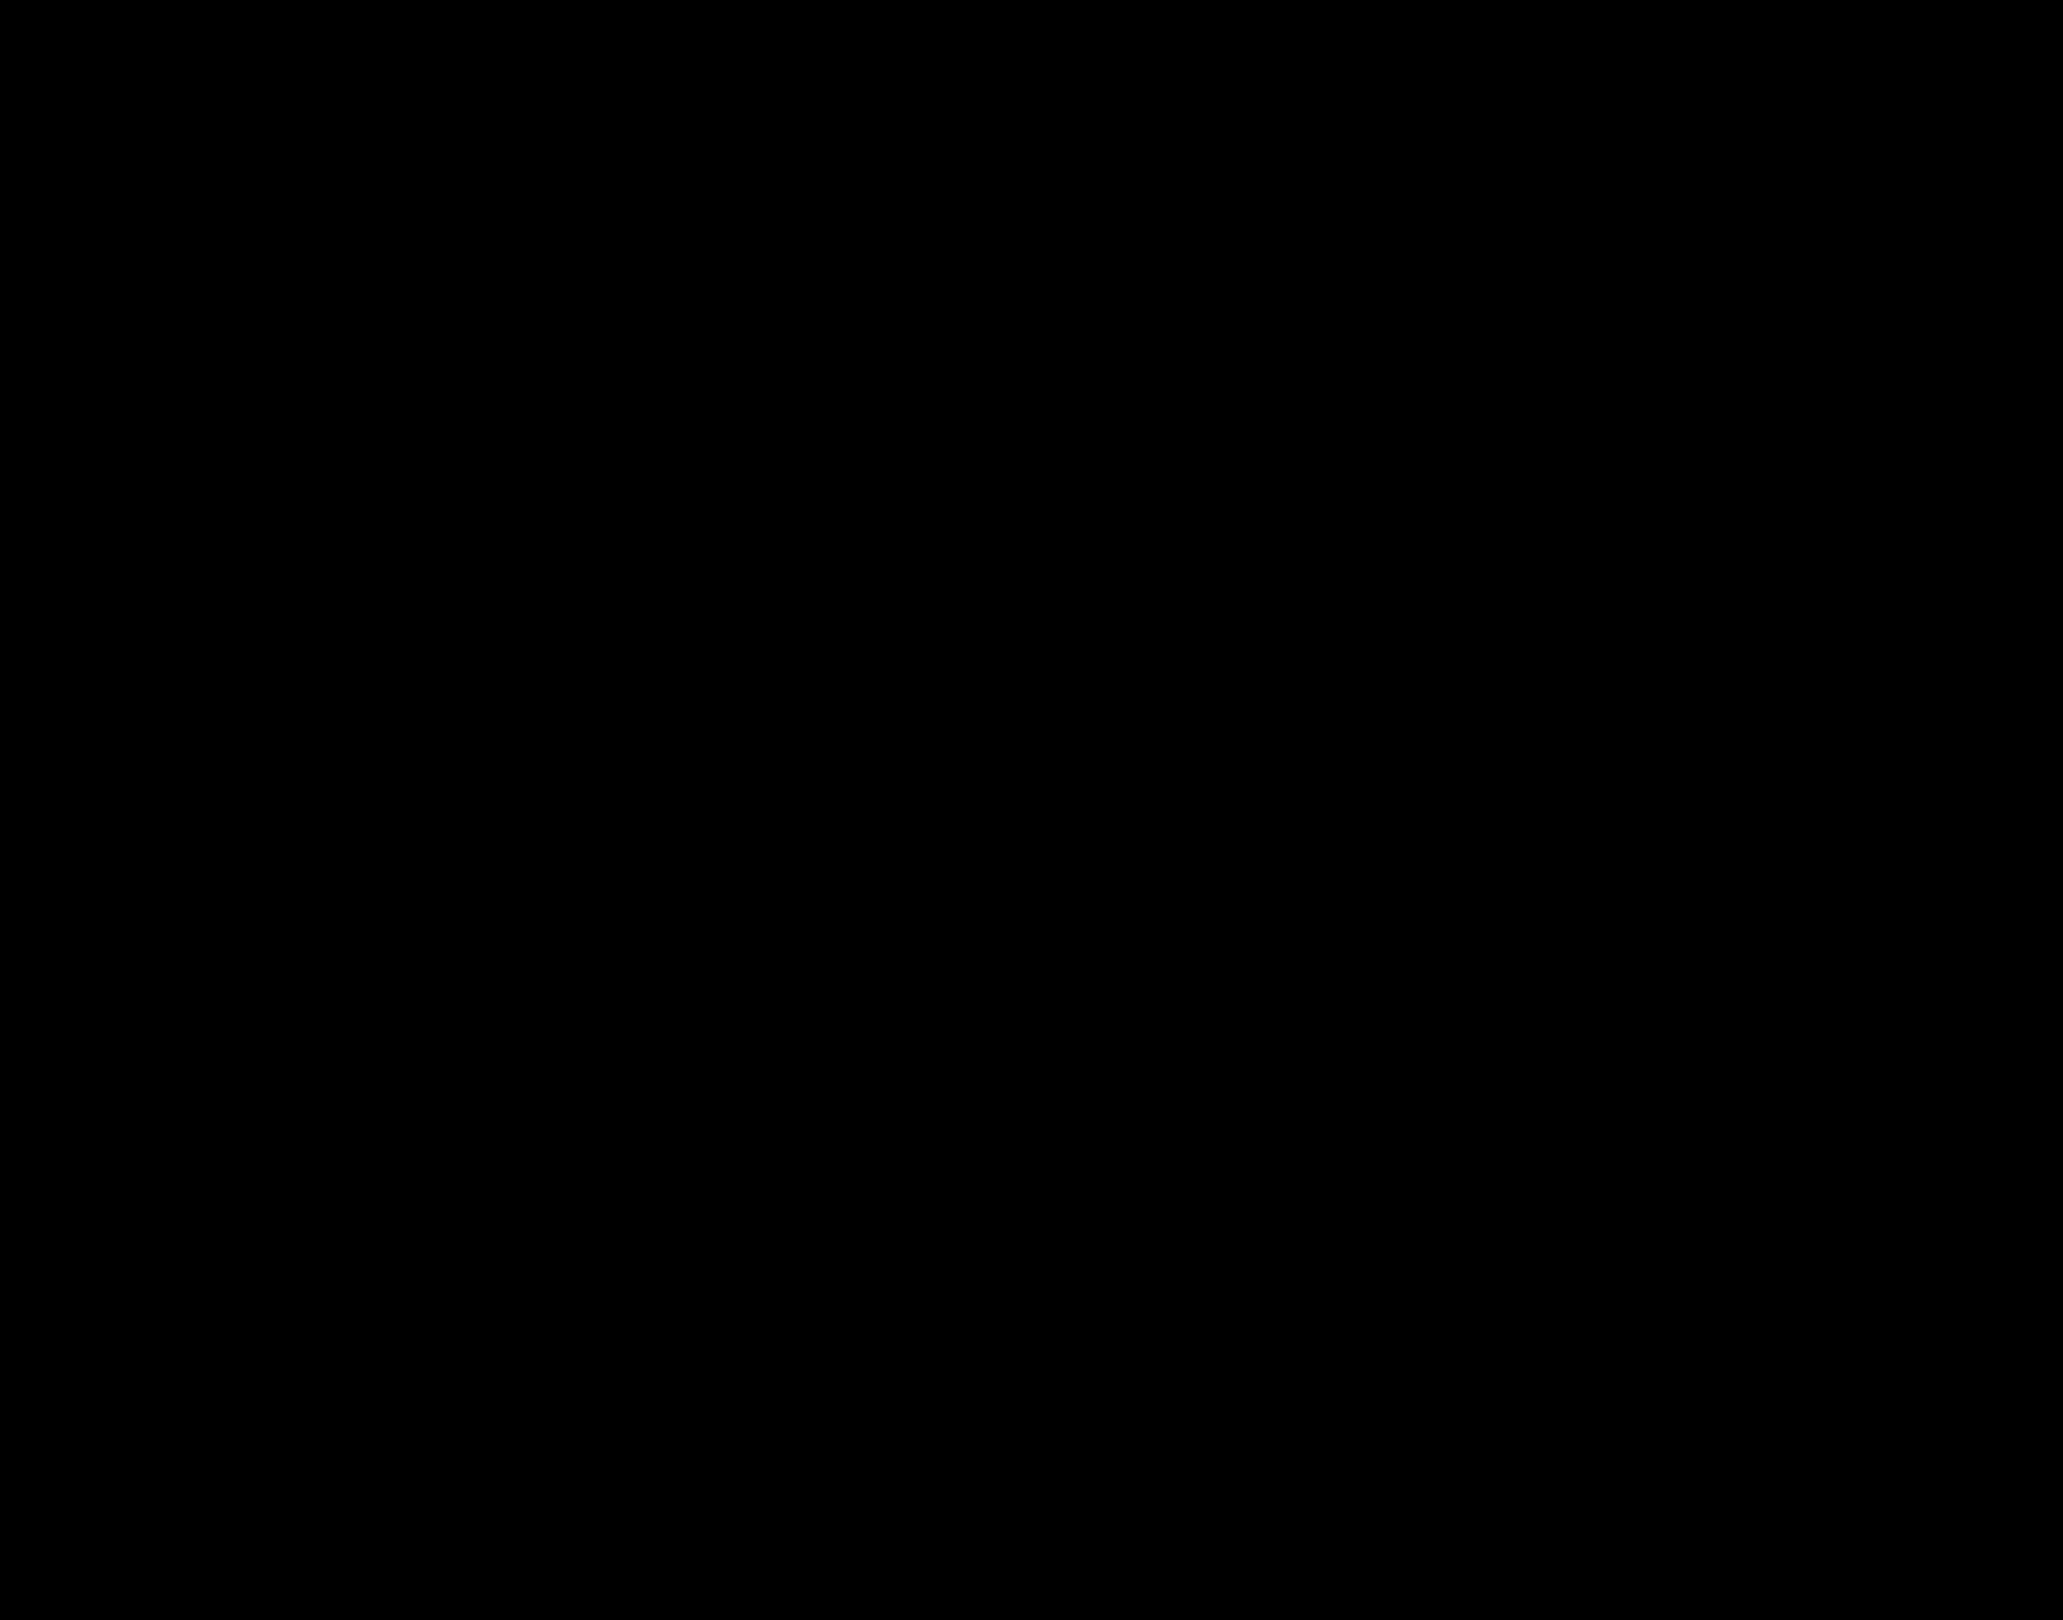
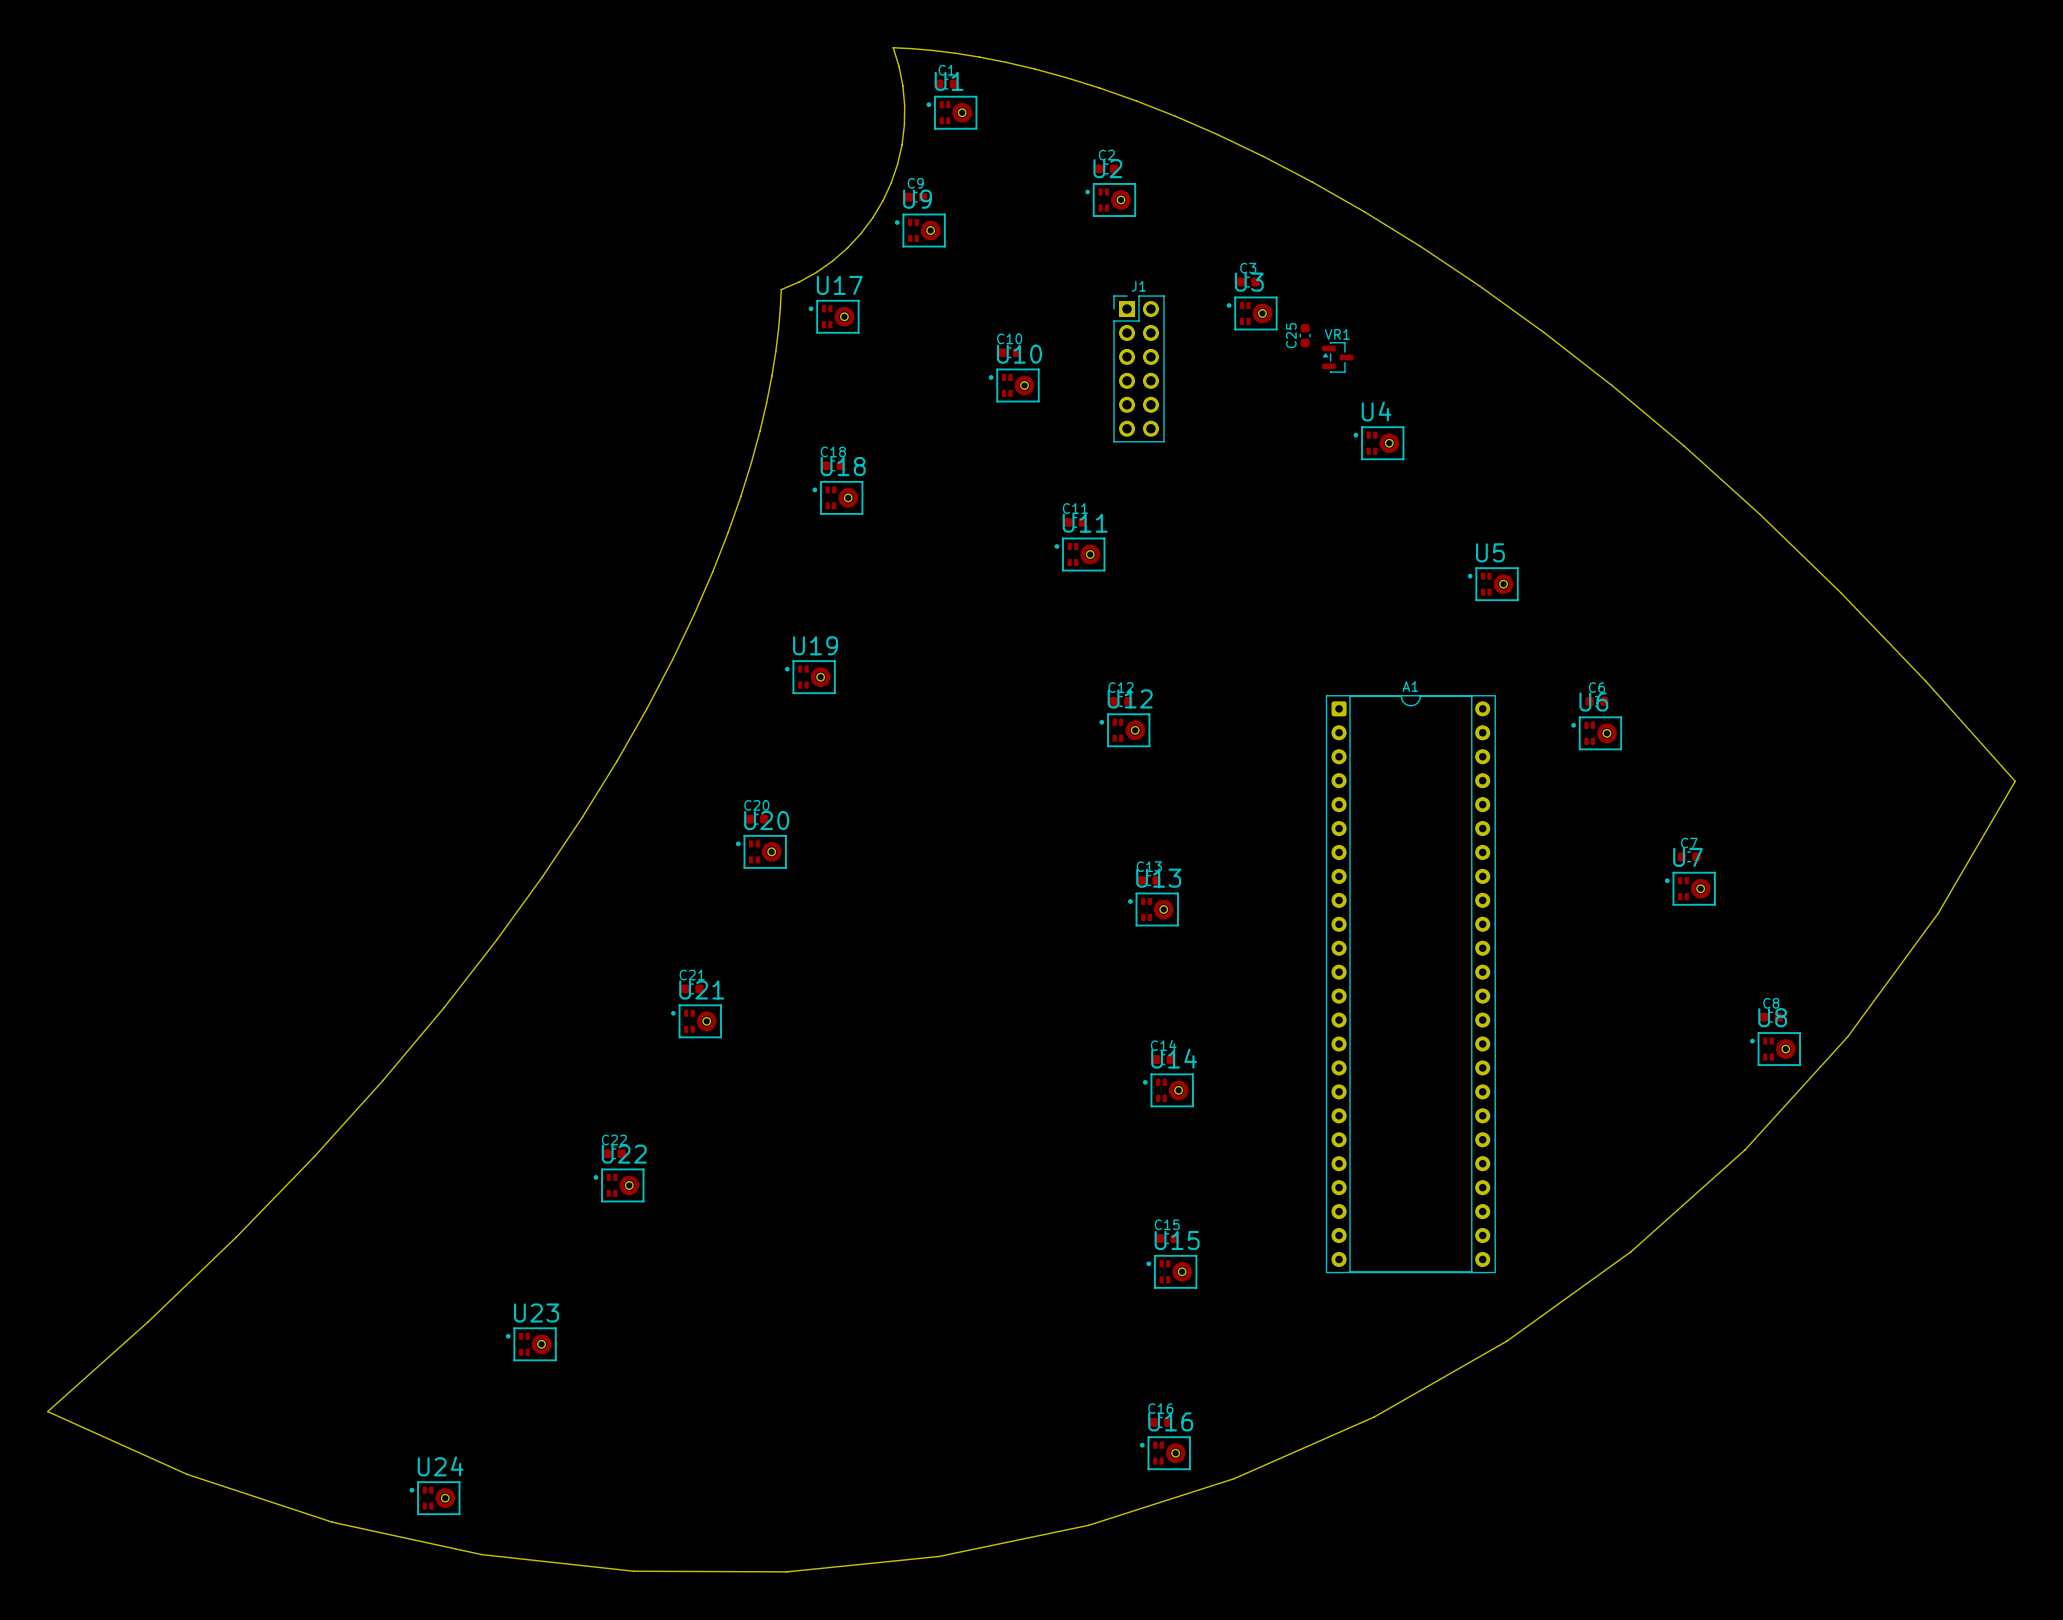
board edge: none -> (893, 47) (902, 85) (904, 105) (902, 144) (891, 182) (872, 217) (847, 247) (816, 272) (781, 289) (775, 351) (766, 402) (751, 462) (728, 532) (694, 614) (672, 659) (617, 760) (582, 816) (496, 940) (443, 1008) (383, 1080) (314, 1156) (236, 1237) (147, 1322) (47, 1411) (187, 1474) (332, 1522) (481, 1554) (633, 1571) (786, 1571) (938, 1556) (1088, 1525) (1234, 1478) (1374, 1417) (1506, 1341) (1630, 1251) (1745, 1149) (1847, 1036) (1938, 913) (2015, 781) (1925, 681) (1840, 592) (1760, 514) (1683, 445) (1611, 385) (1543, 332) (1420, 246) (1312, 181) (1217, 134) (1136, 100) (1034, 69) (955, 53) (893, 47)
C1: none -> (946, 84)
U1: none -> (951, 112)
C2: none -> (1106, 168)
C9: none -> (915, 197)
U2: none -> (1110, 199)
U9: none -> (920, 230)
C3: none -> (1248, 282)
U3: none -> (1252, 313)
U17: none -> (834, 316)
C25: none -> (1305, 335)
C10: none -> (1009, 352)
VR1: none -> (1337, 357)
J1: none -> (1138, 368)
U10: none -> (1014, 385)
U4: none -> (1378, 443)
C18: none -> (833, 465)
U18: none -> (837, 497)
C11: none -> (1075, 522)
U11: none -> (1079, 554)
U5: none -> (1493, 584)
U19: none -> (810, 677)
C12: none -> (1120, 701)
C6: none -> (1596, 701)
U12: none -> (1124, 730)
U6: none -> (1596, 733)
C20: none -> (756, 819)
U20: none -> (761, 851)
C7: none -> (1689, 856)
C13: none -> (1149, 880)
U7: none -> (1690, 888)
U13: none -> (1153, 909)
A1: none -> (1410, 984)
C21: none -> (692, 988)
C8: none -> (1771, 1017)
U21: none -> (696, 1021)
U8: none -> (1775, 1049)
C14: none -> (1163, 1059)
U14: none -> (1168, 1090)
C22: none -> (614, 1153)
U22: none -> (619, 1185)
C15: none -> (1167, 1238)
U15: none -> (1171, 1271)
U23: none -> (531, 1344)
C16: none -> (1160, 1422)
U16: none -> (1165, 1453)
U24: none -> (435, 1498)

